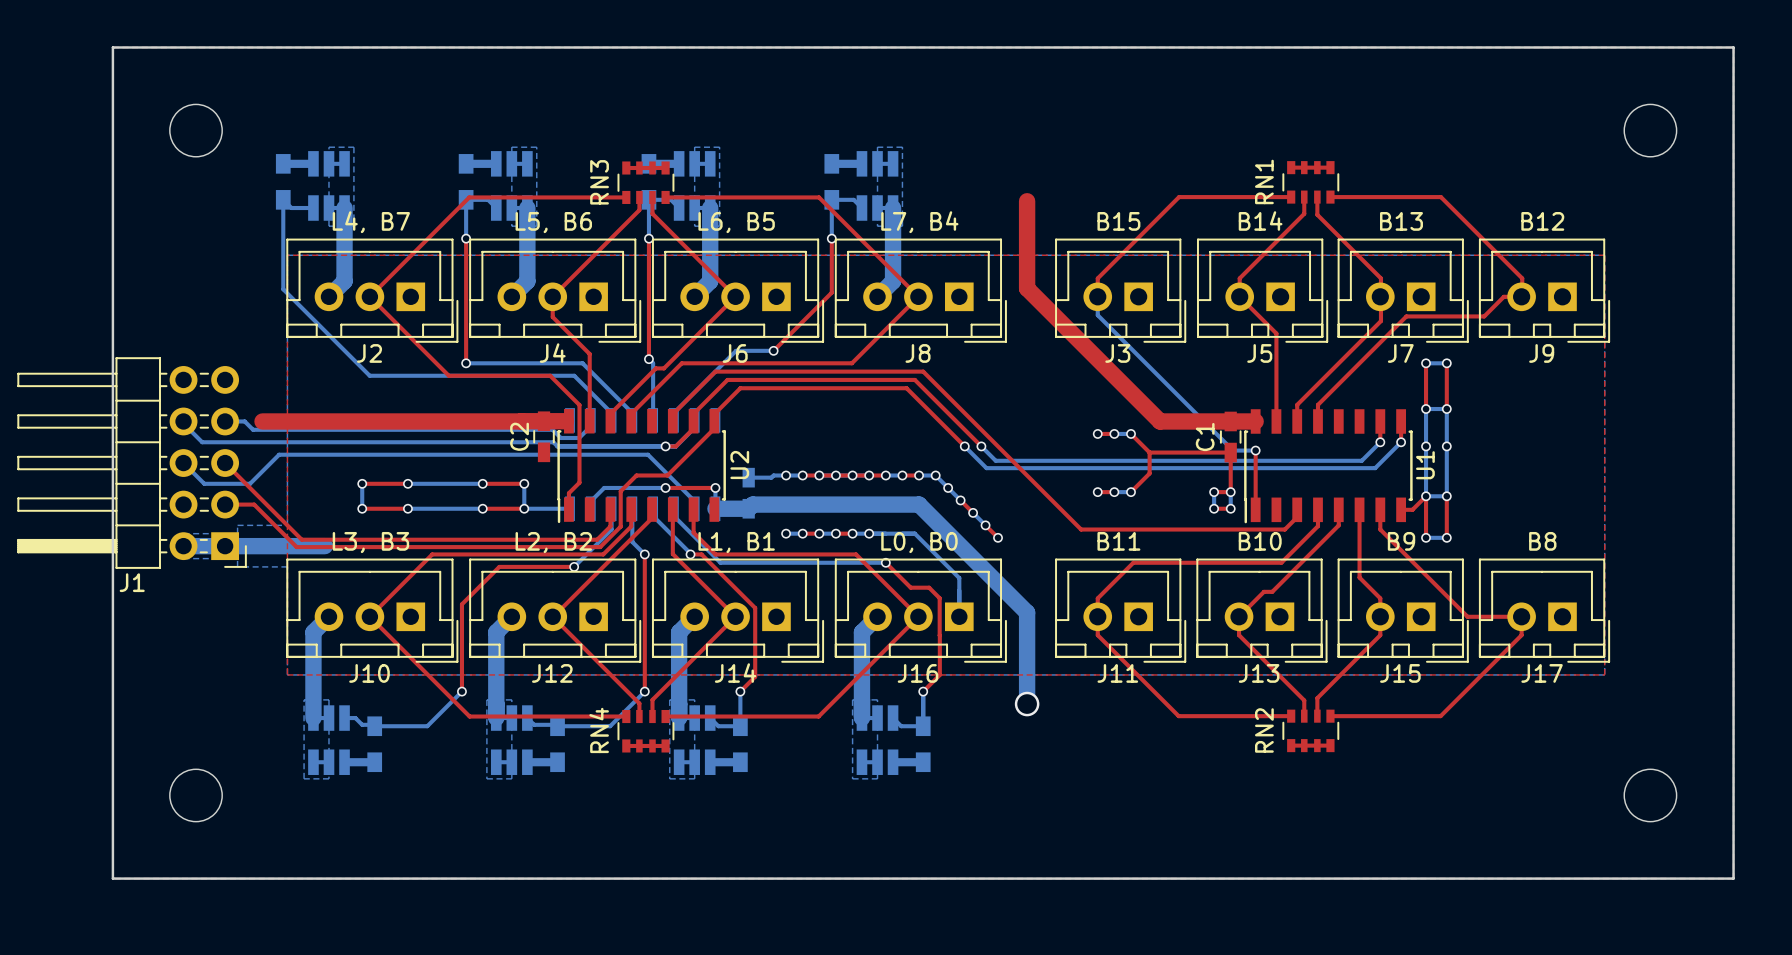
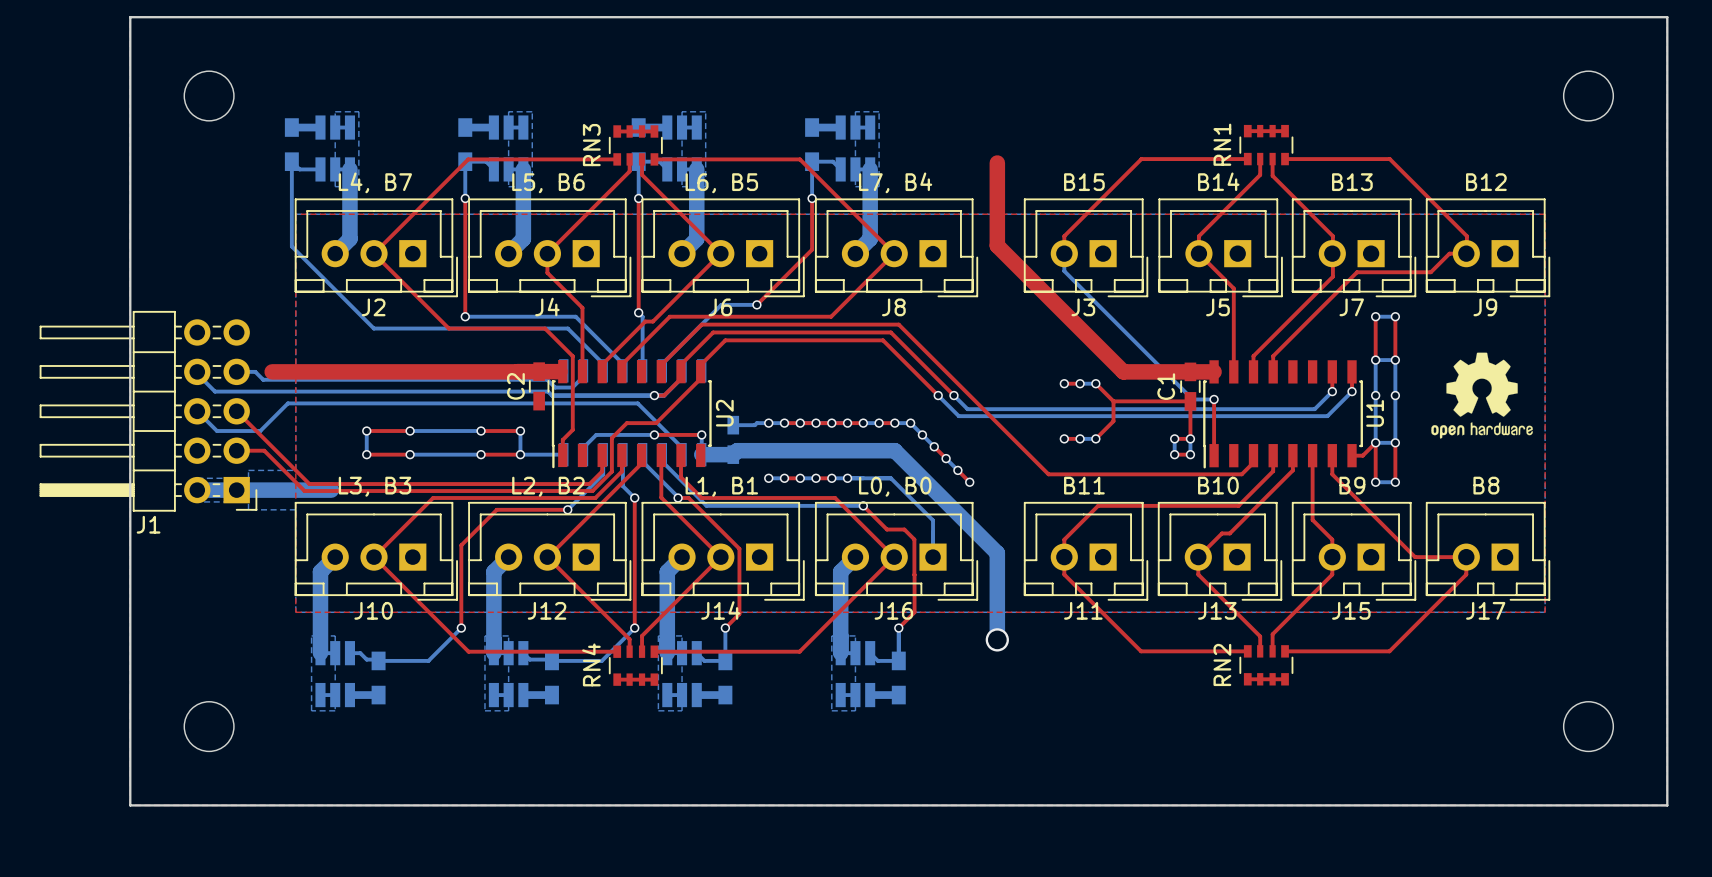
drawing: none -> [1431, 352, 1533, 439]

